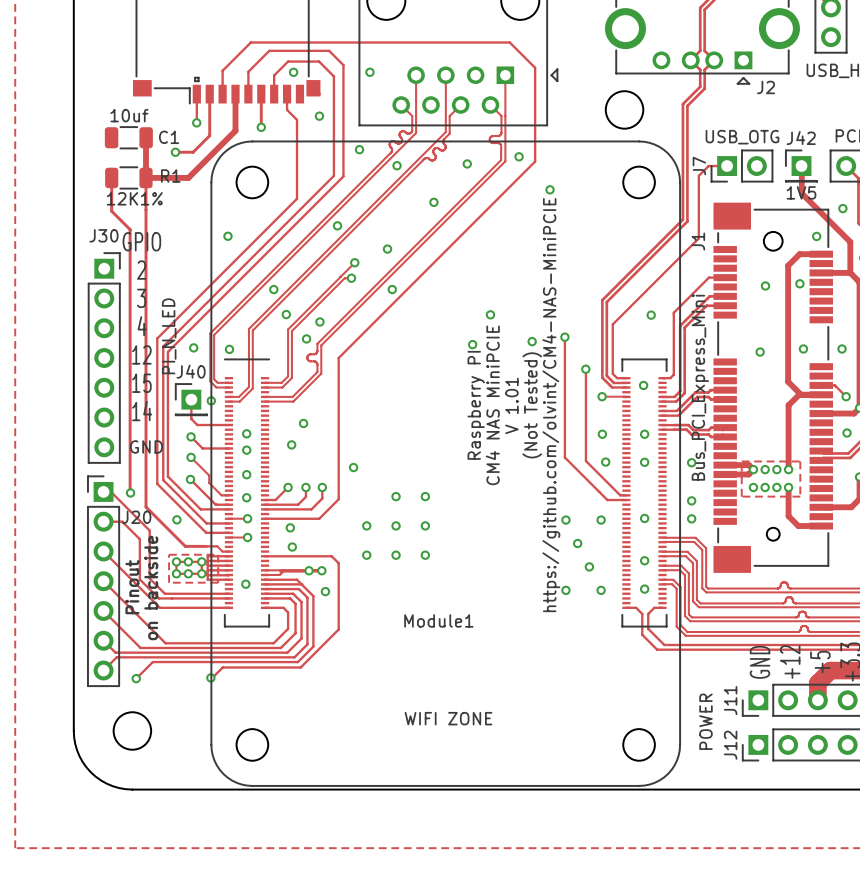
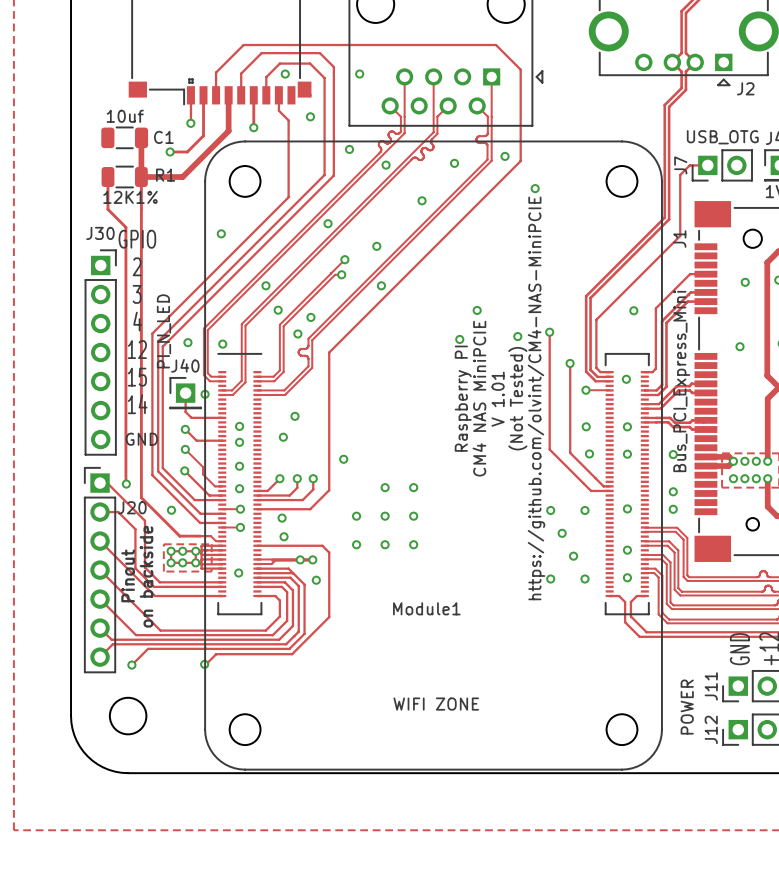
round board edge: [605, 90, 644, 130] -> none

